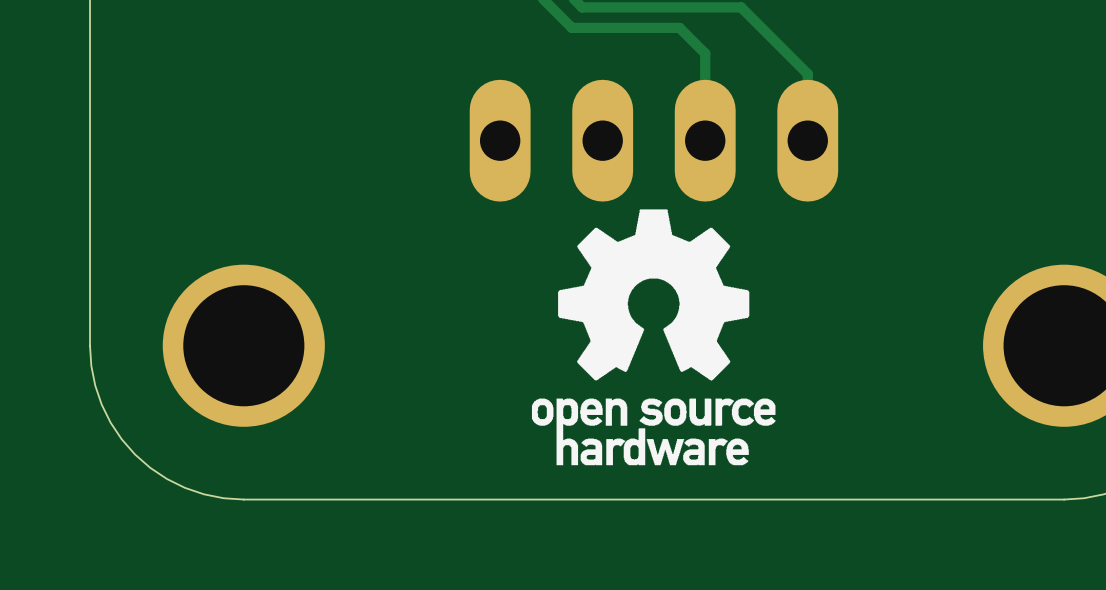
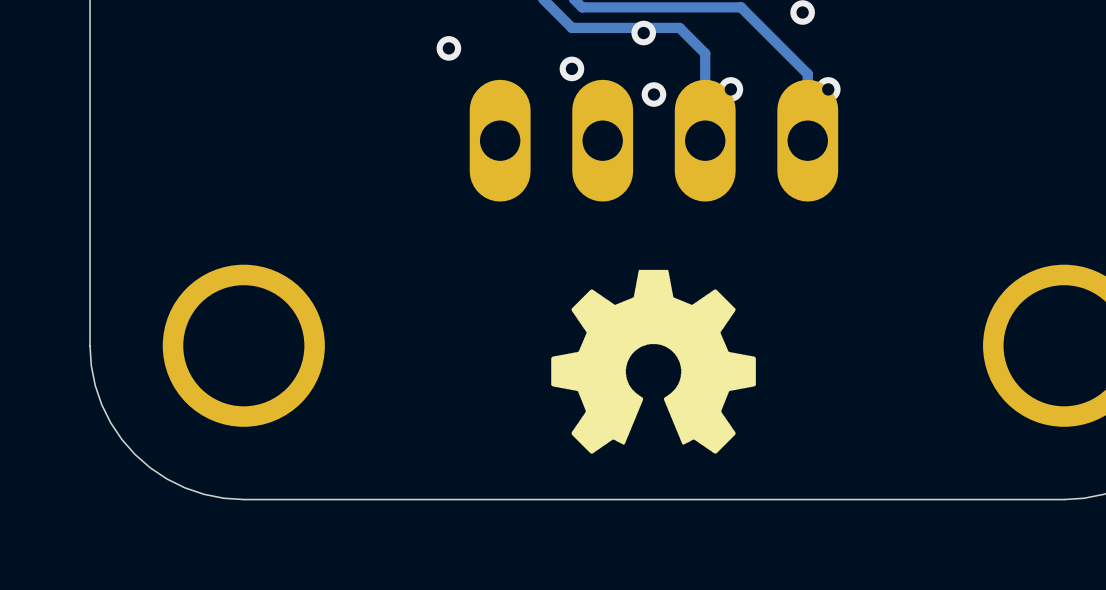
via: none -> (802, 12)
via: none -> (643, 33)
via: none -> (448, 48)
via: none -> (571, 68)
via: none -> (730, 89)
via: none -> (828, 89)
via: none -> (653, 94)
drawing shape: [531, 209, 776, 466] -> [551, 269, 756, 454]

